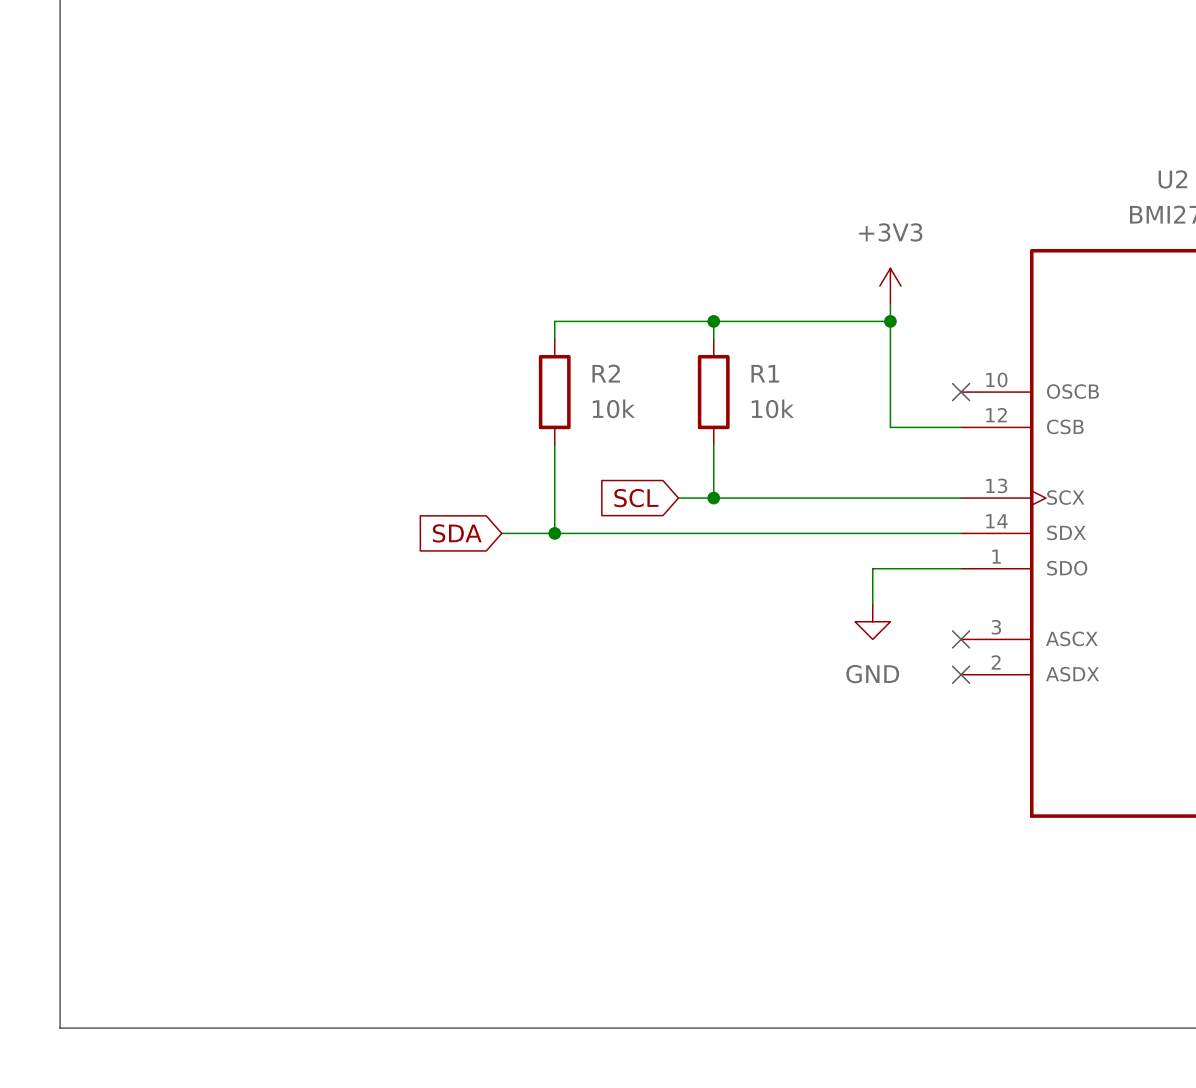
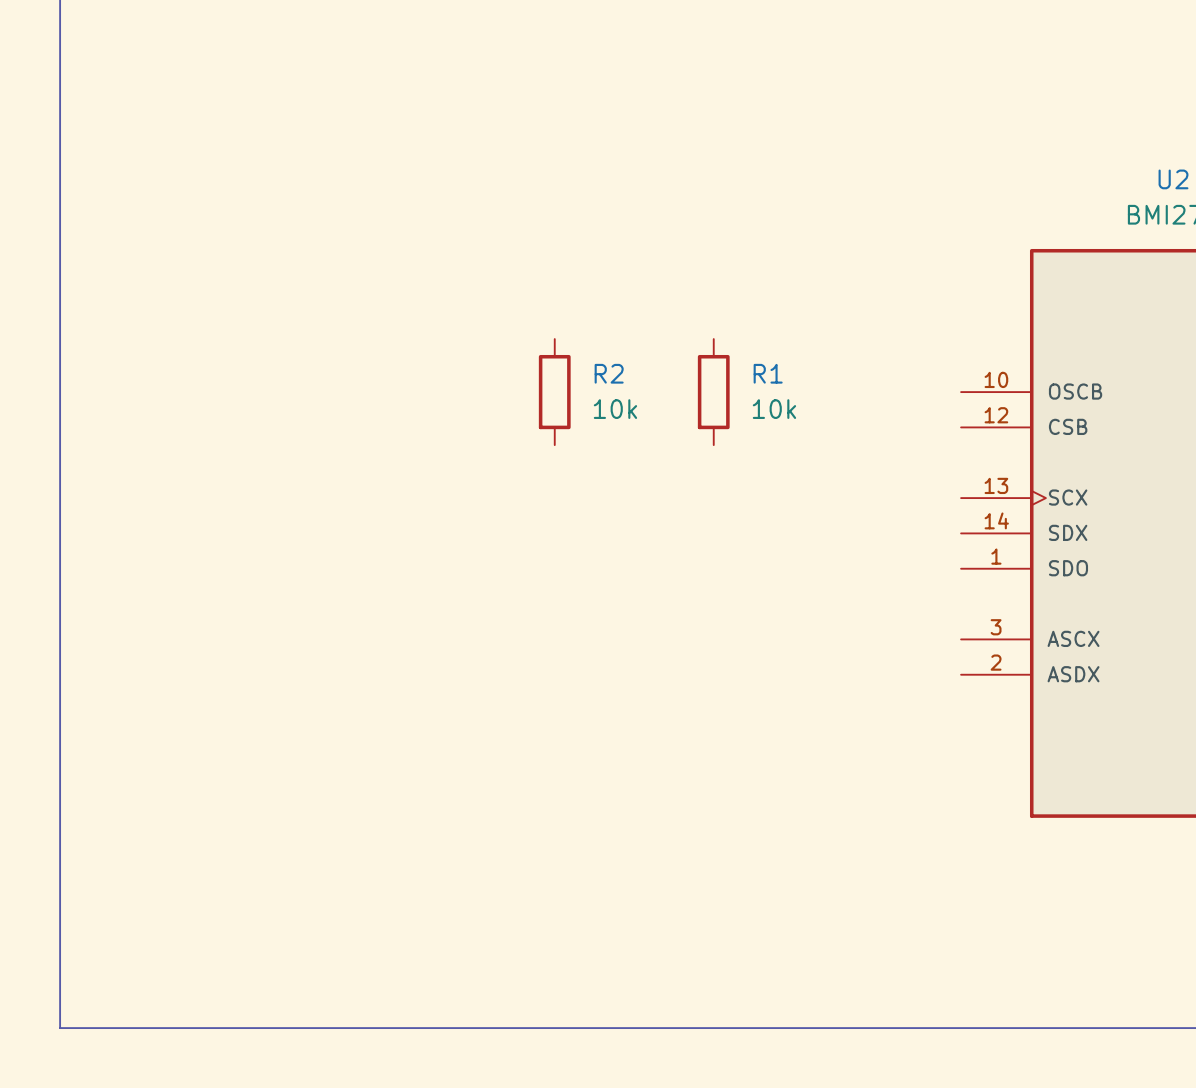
power symbol: +3V3 (890, 286) -> none
wire: (890, 303) (890, 427) (961, 427) -> none
wire: (713, 321) (713, 339) -> none
junction: (713, 321) -> none
wire: (890, 321) (554, 321) (554, 339) -> none
junction: (890, 321) -> none
no-connect mark: (961, 392) -> none
wire: (554, 445) (554, 533) -> none
wire: (713, 445) (713, 498) -> none
global label: SCL (636, 498) -> none
wire: (678, 498) (961, 498) -> none
junction: (713, 498) -> none
global label: SDA (457, 533) -> none
wire: (501, 533) (961, 533) -> none
junction: (554, 533) -> none
wire: (961, 568) (872, 568) (872, 604) -> none
power symbol: GND (872, 621) -> none
no-connect mark: (961, 639) -> none
no-connect mark: (961, 674) -> none

